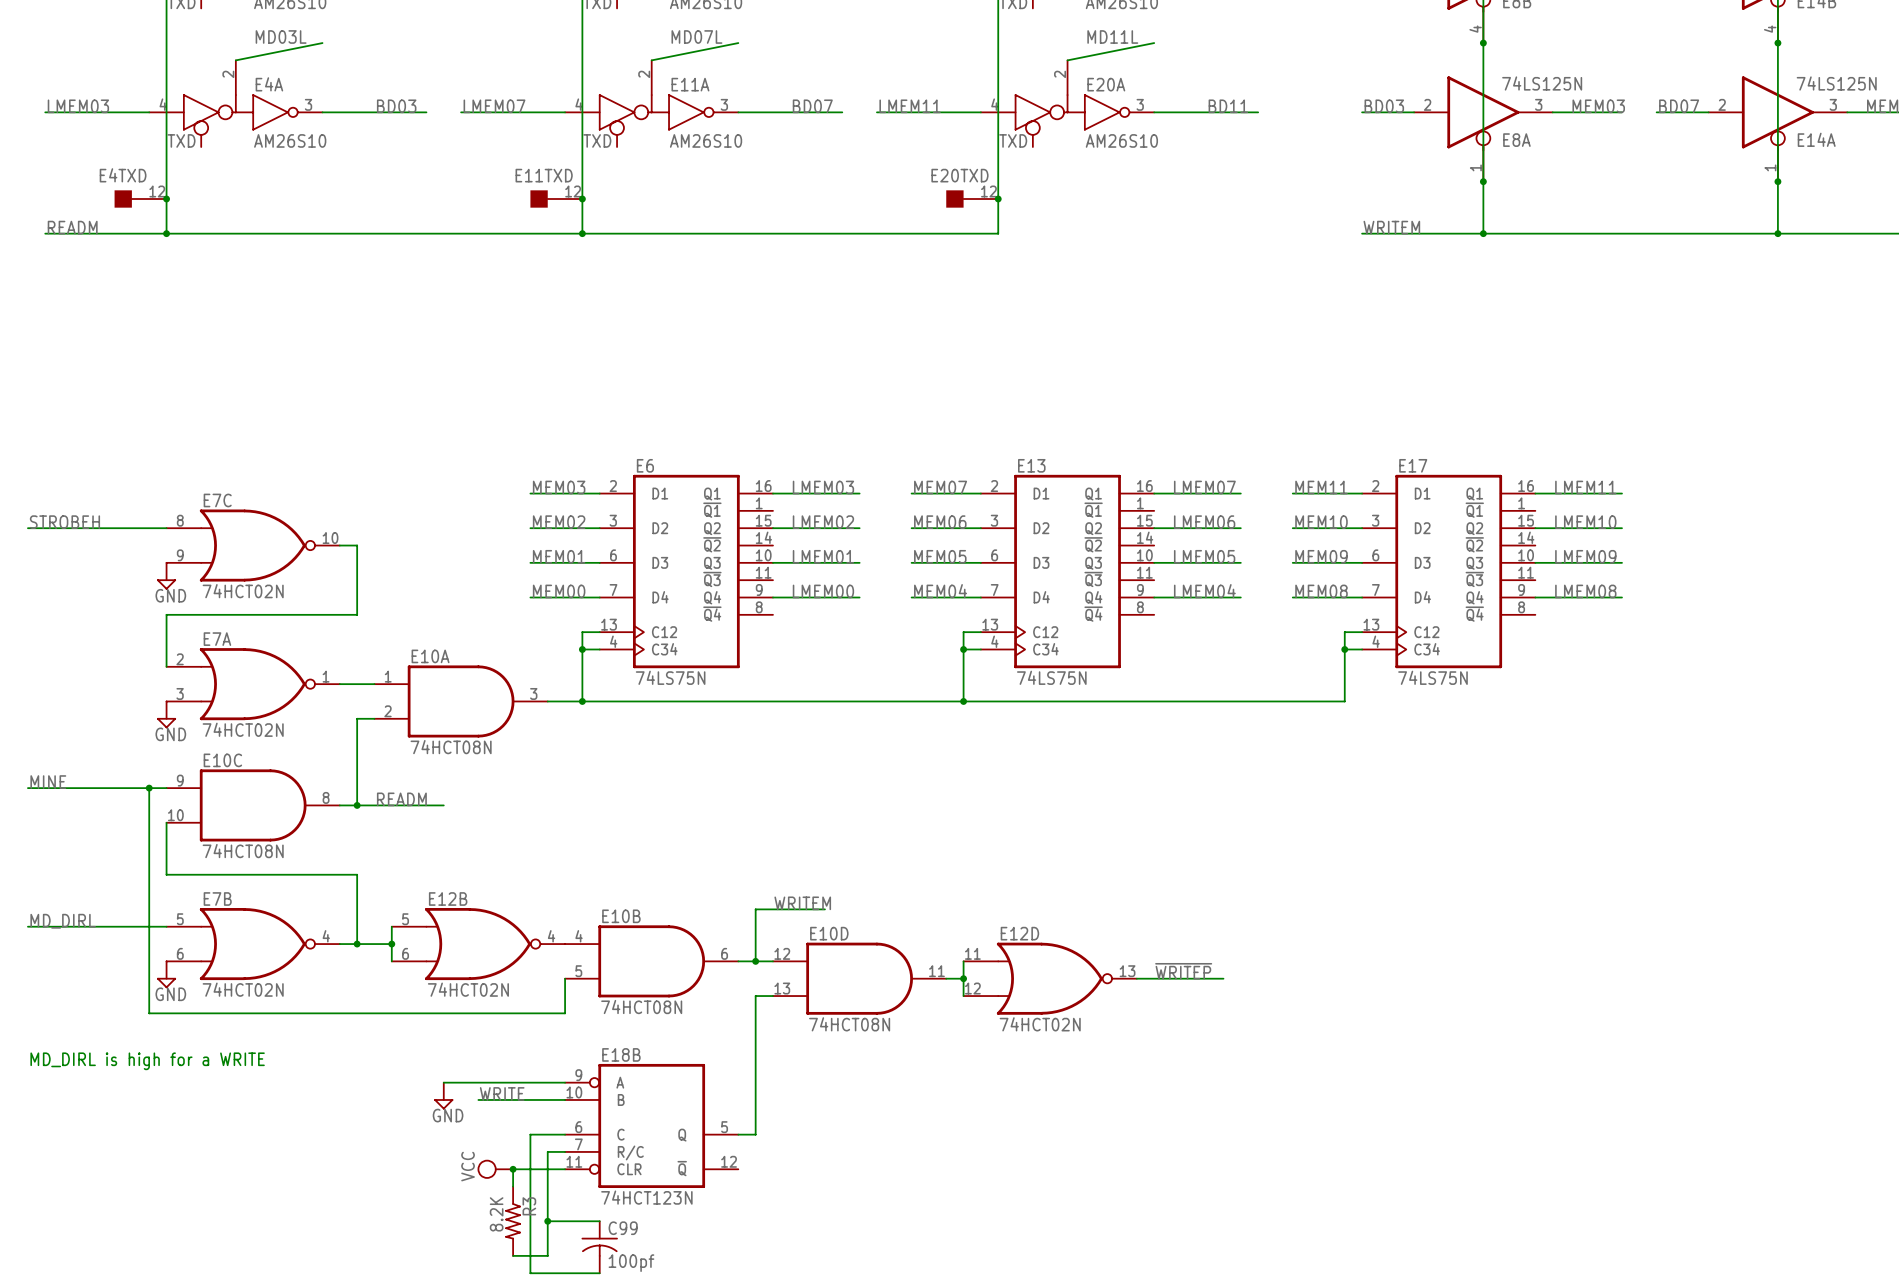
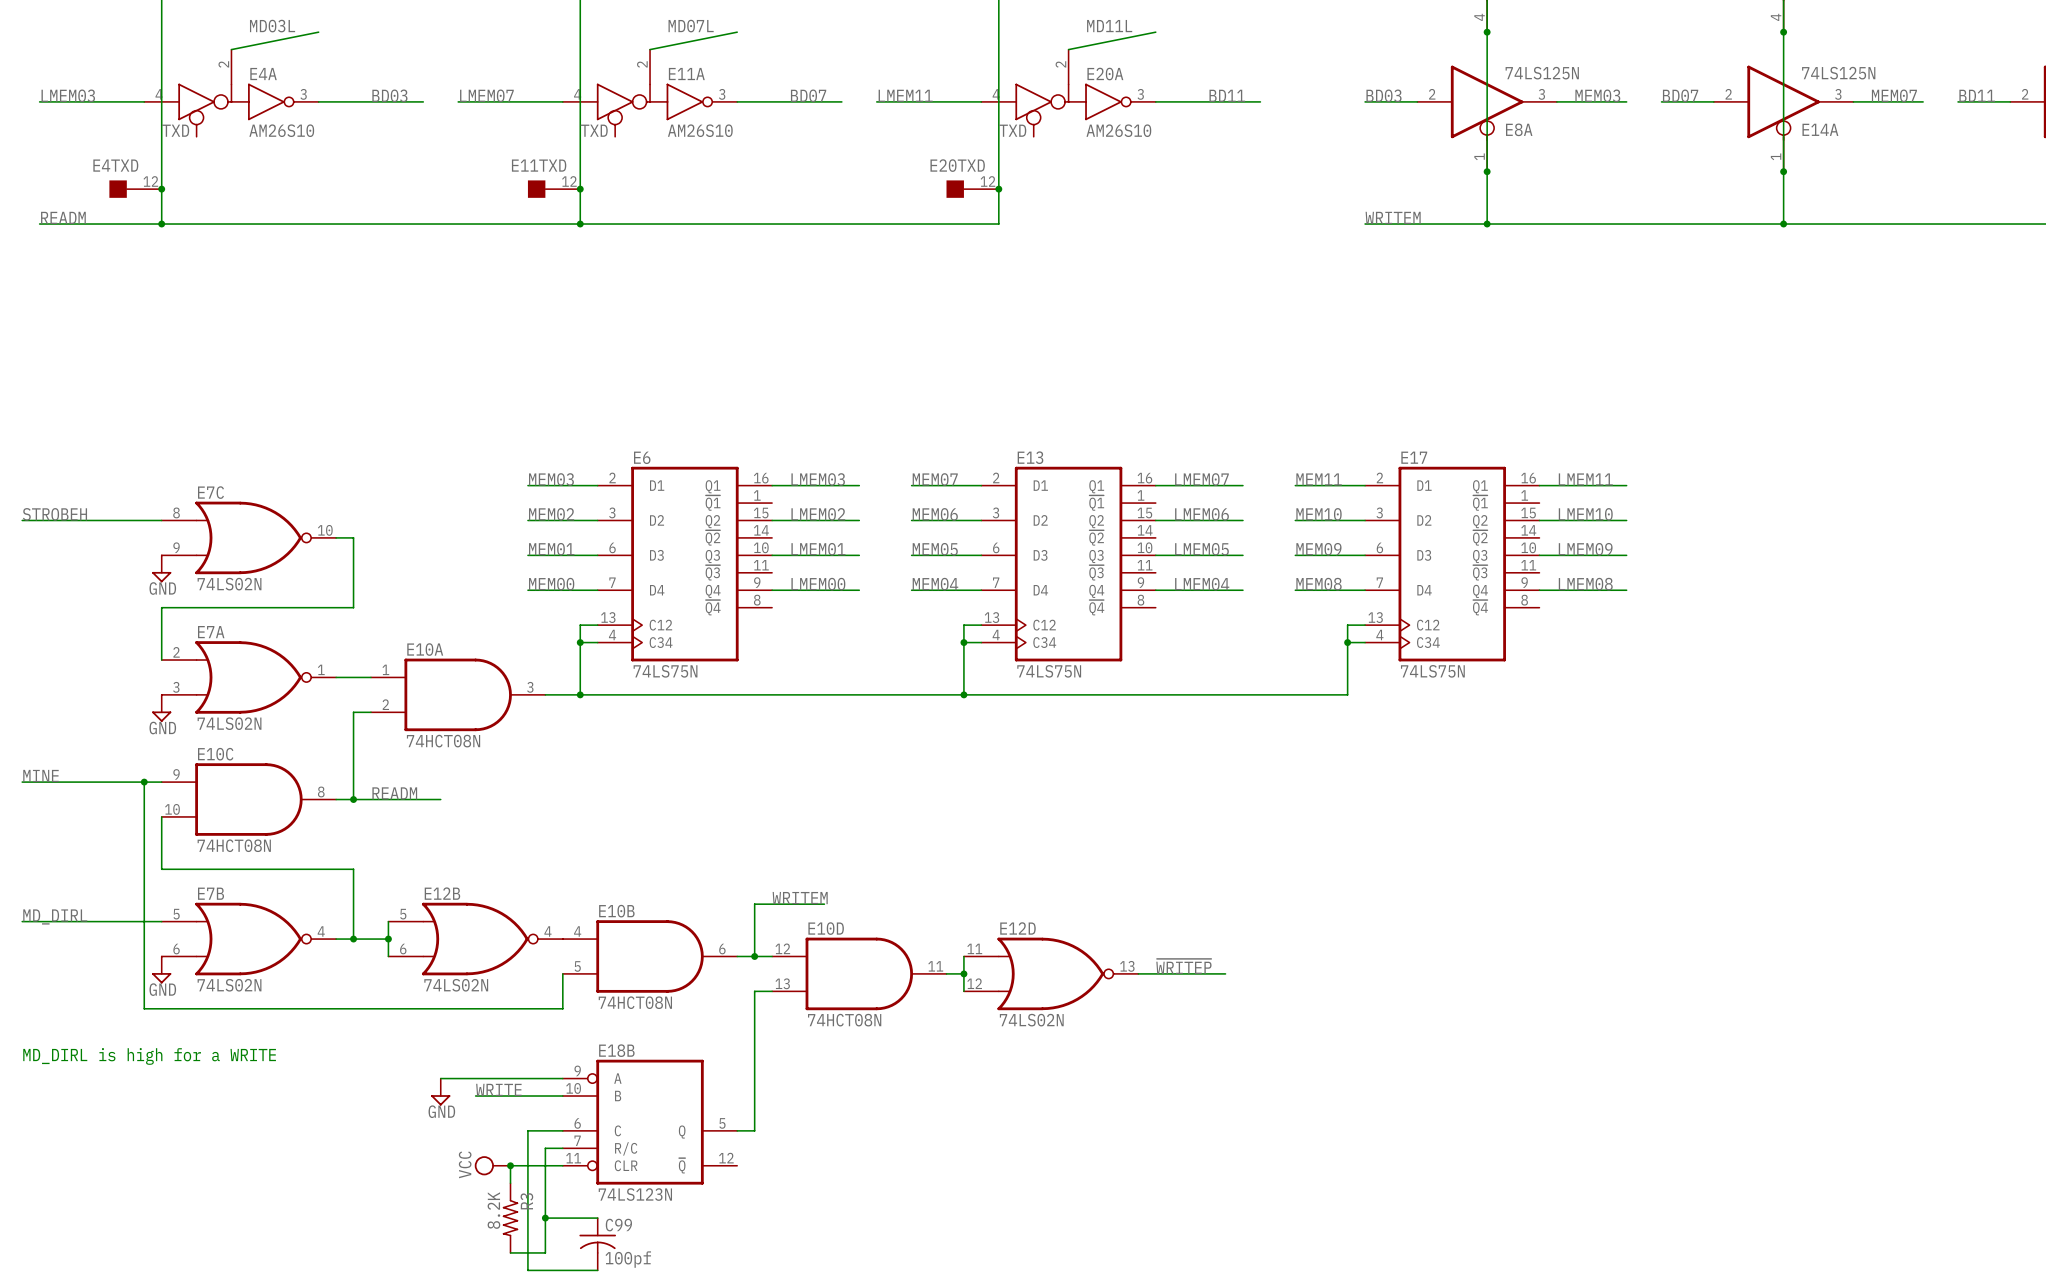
E7C value: 74HCT02N (243, 591) -> 74LS02N (229, 584)
E7A value: 74HCT02N (243, 729) -> 74LS02N (229, 723)
E7B value: 74HCT02N (243, 989) -> 74LS02N (229, 985)
E12B value: 74HCT02N (468, 989) -> 74LS02N (456, 985)
E12D value: 74HCT02N (1040, 1024) -> 74LS02N (1031, 1020)
E18B value: 74HCT123N (646, 1197) -> 74LS123N (635, 1194)

